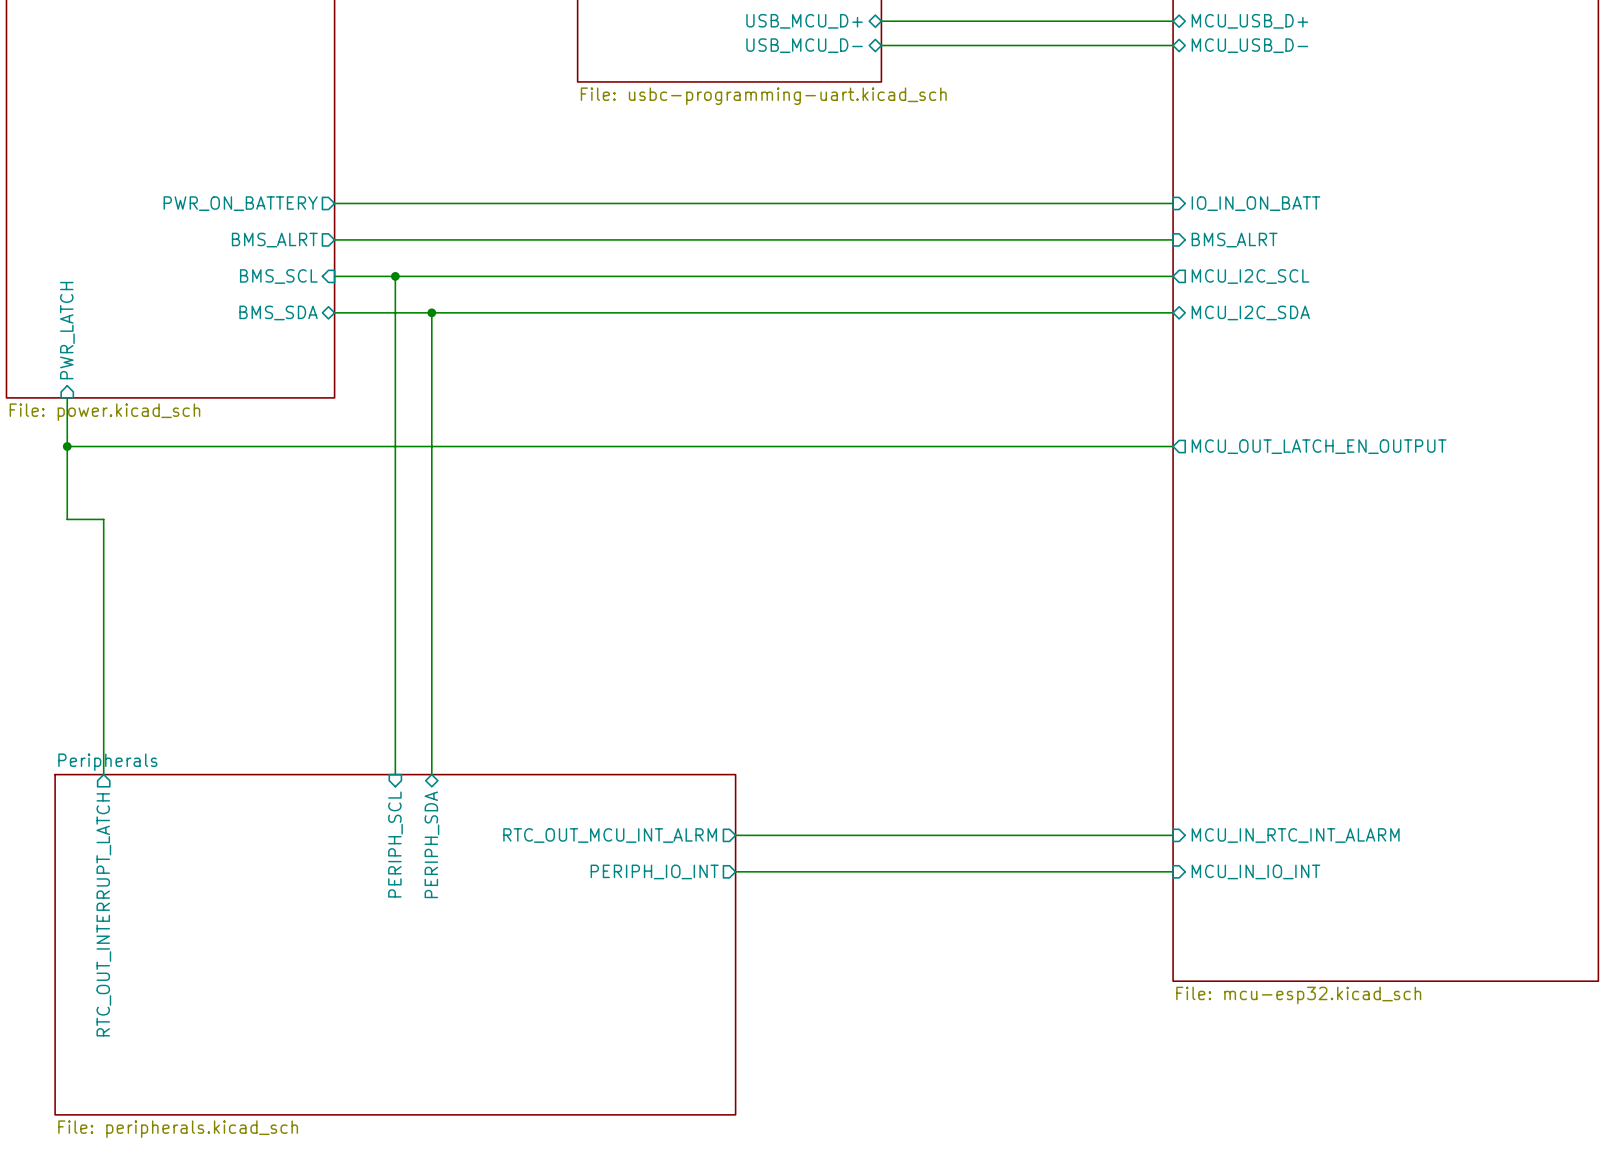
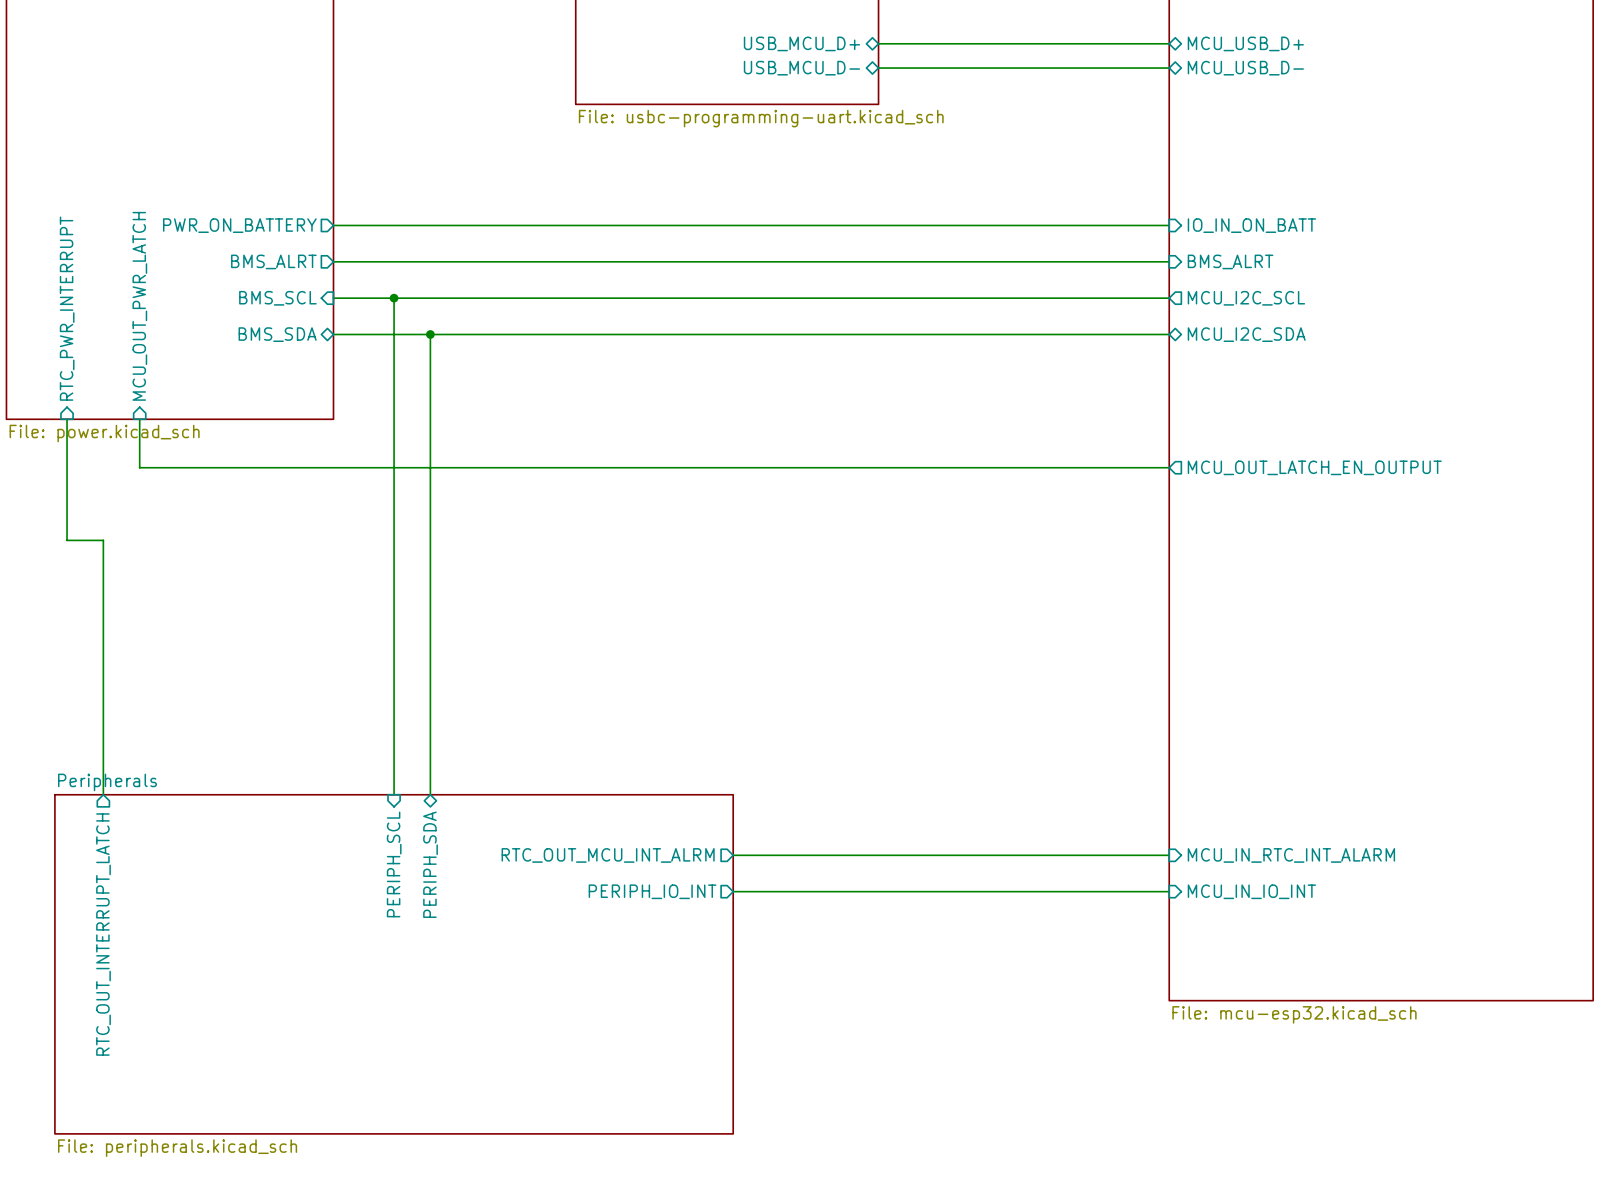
sheet pin: none -> MCU_OUT_PWR_LATCH (139, 306)
sheet pin: PWR_LATCH (67, 330) -> RTC_PWR_INTERRUPT (67, 308)
wire: (67, 446) (140, 446) -> (139, 419) (139, 467)
junction: (67, 446) -> none

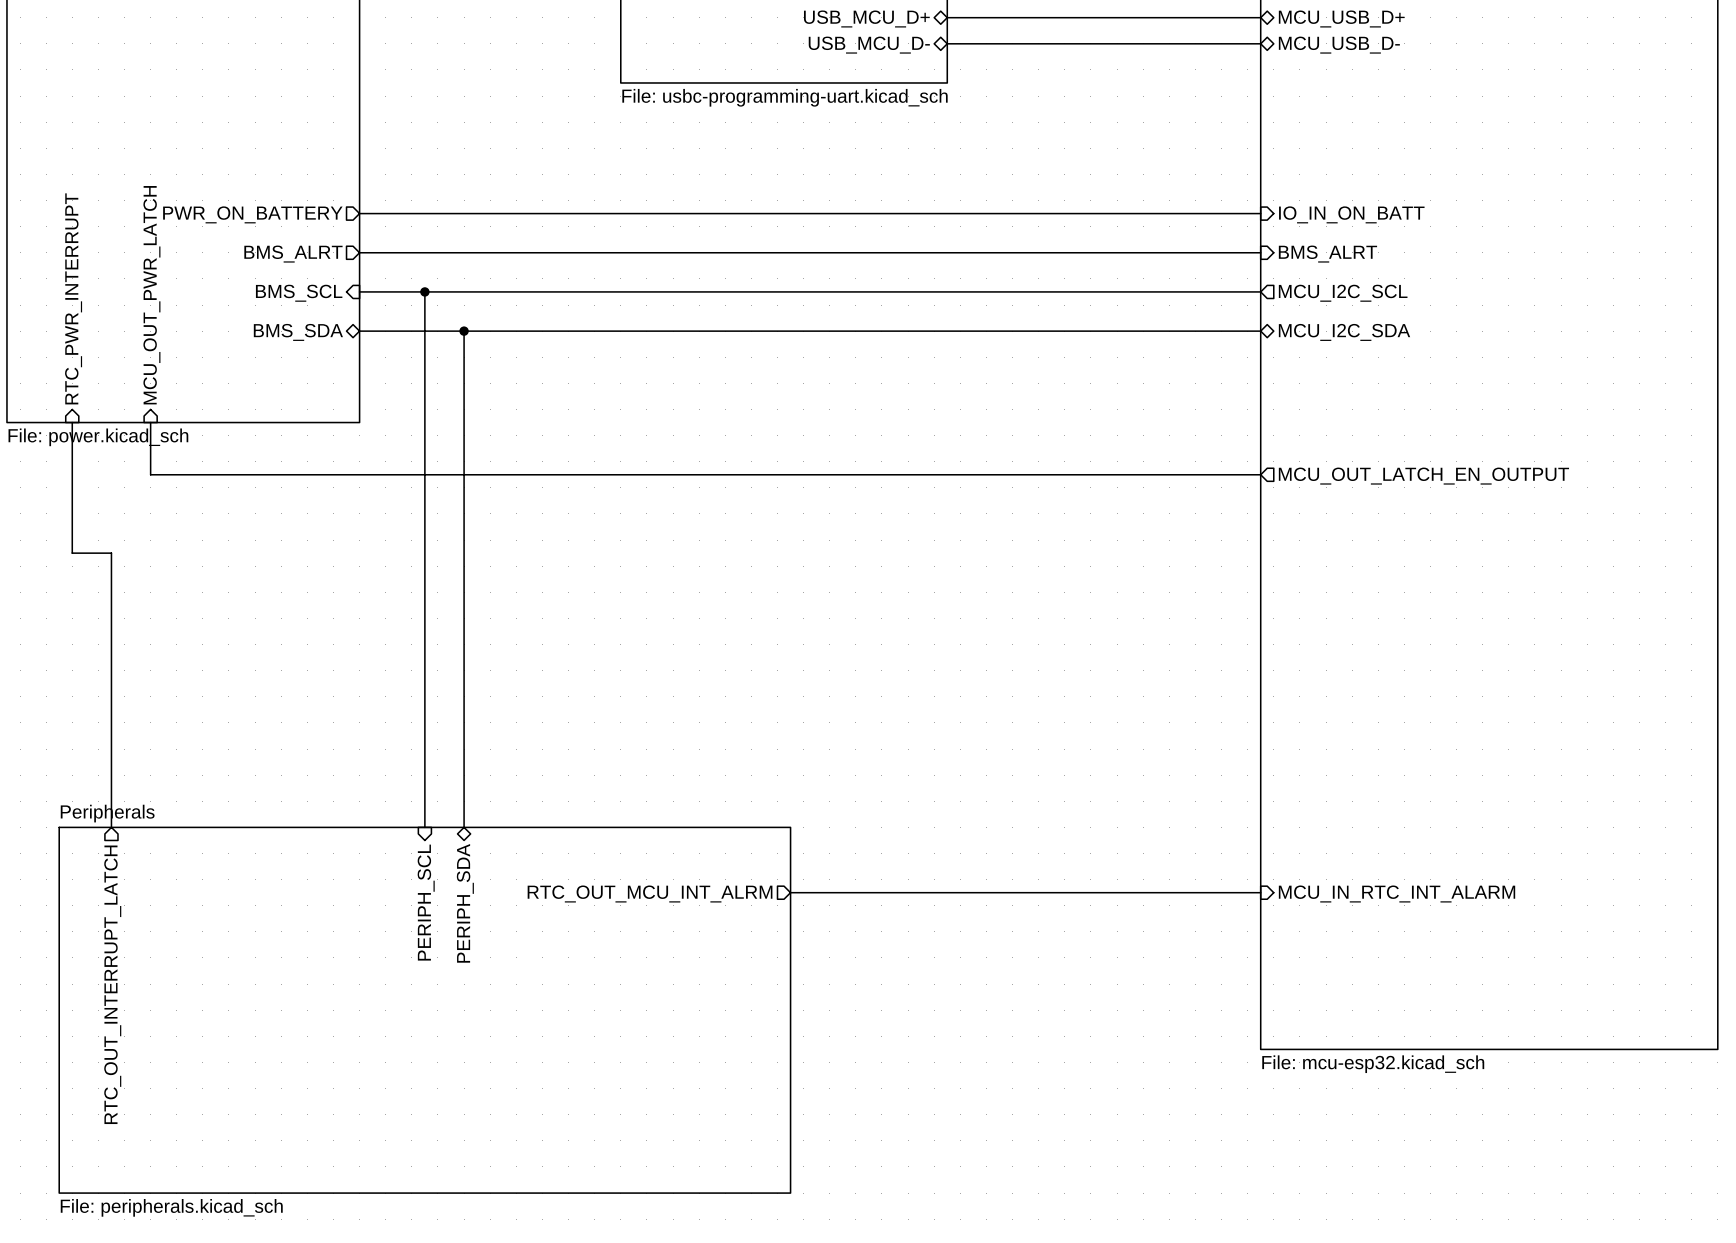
sheet pin: PERIPH_IO_INT (652, 891) -> none
wire: (733, 891) (1169, 891) -> none
sheet pin: MCU_IN_IO_INT (1251, 891) -> none

